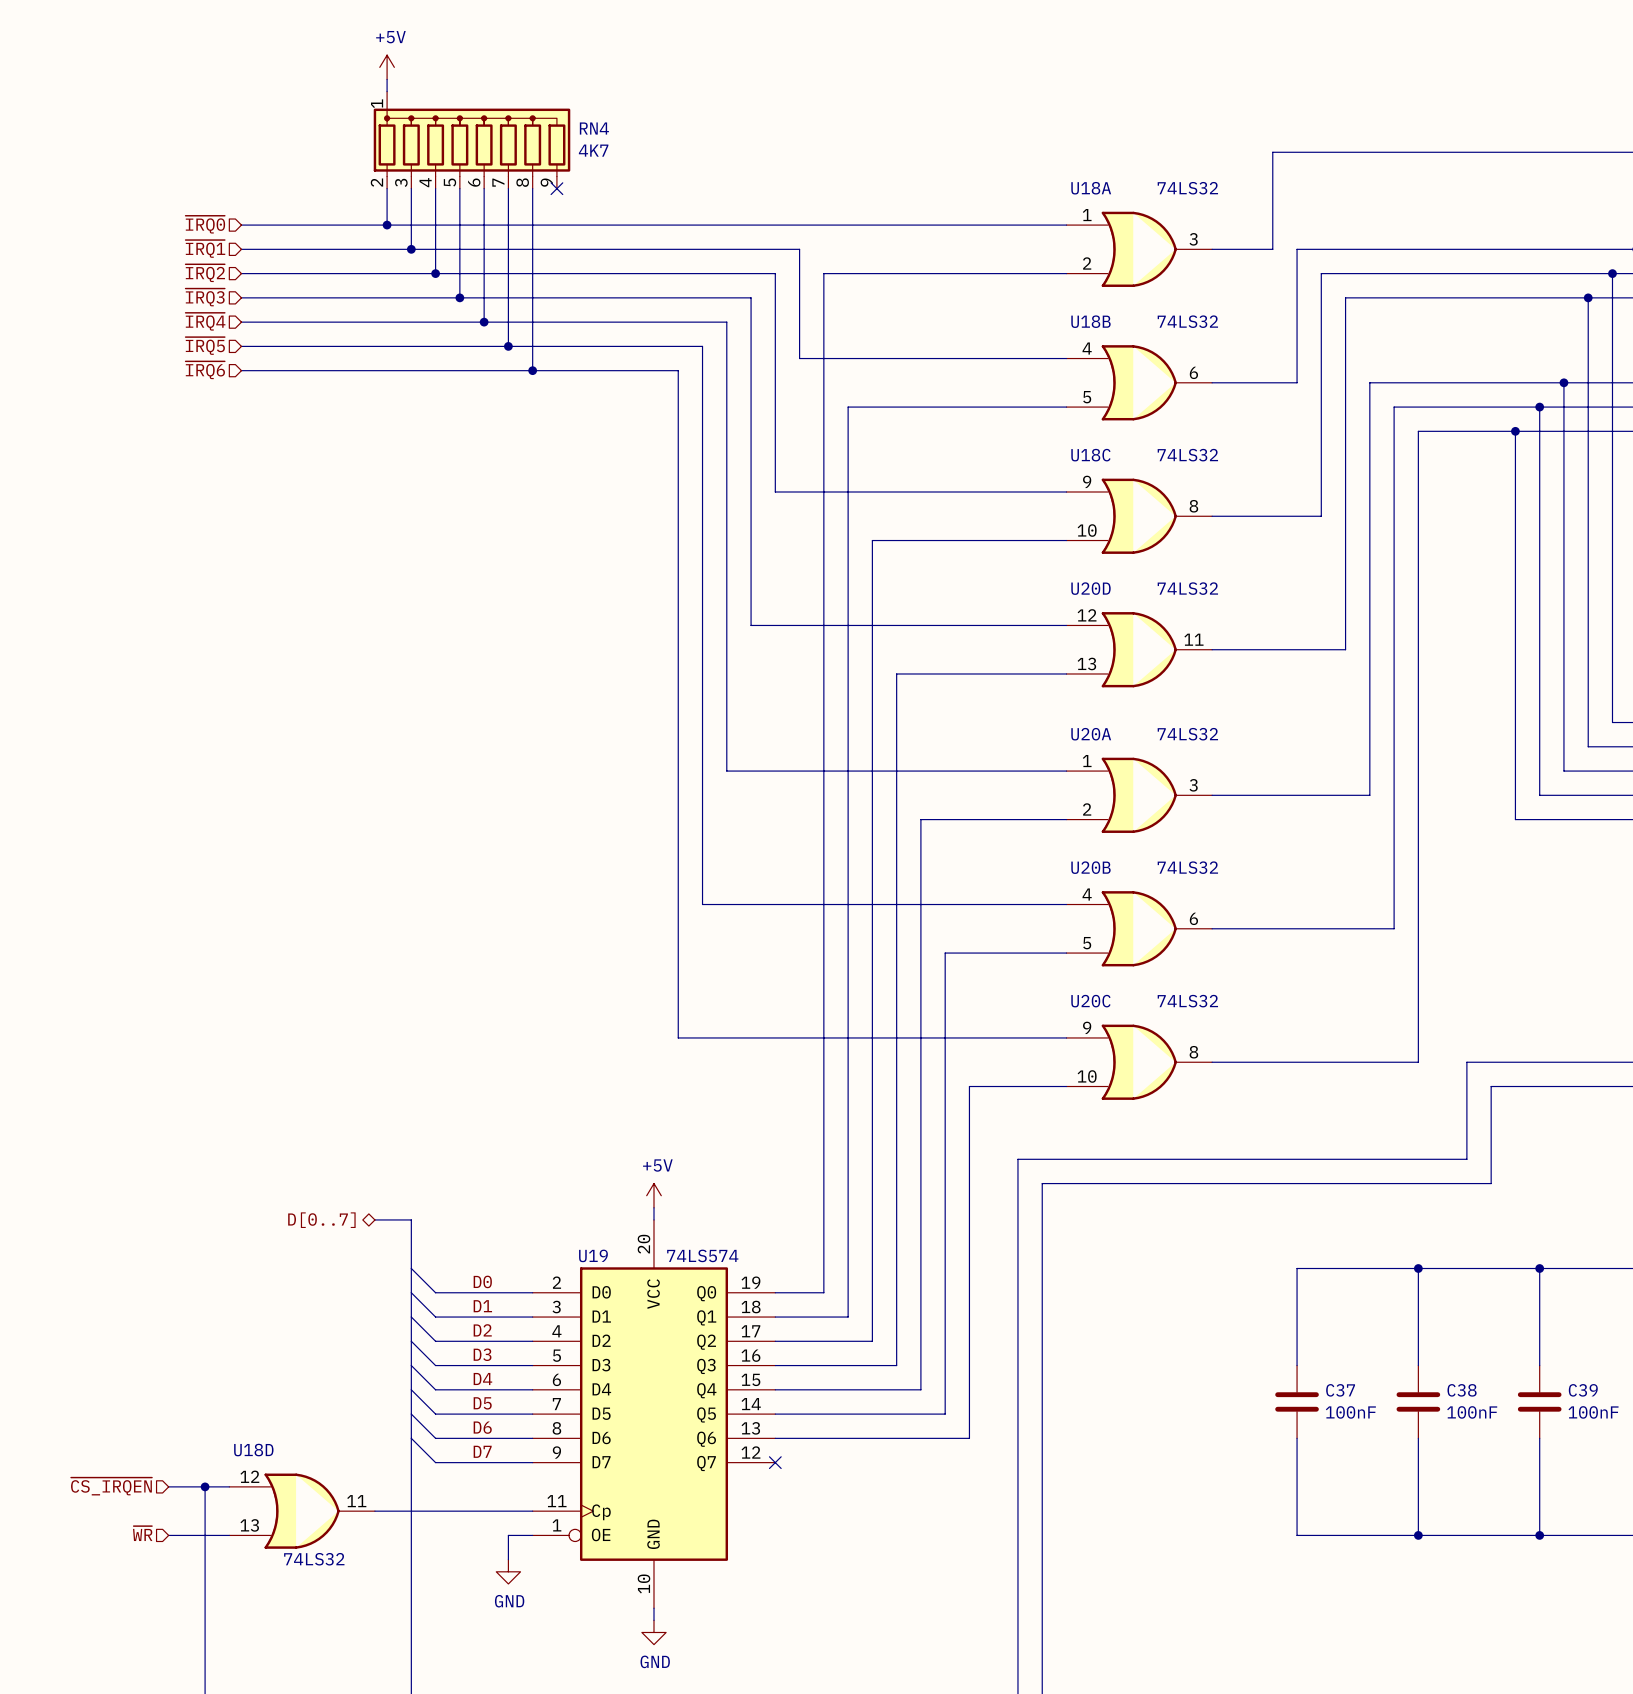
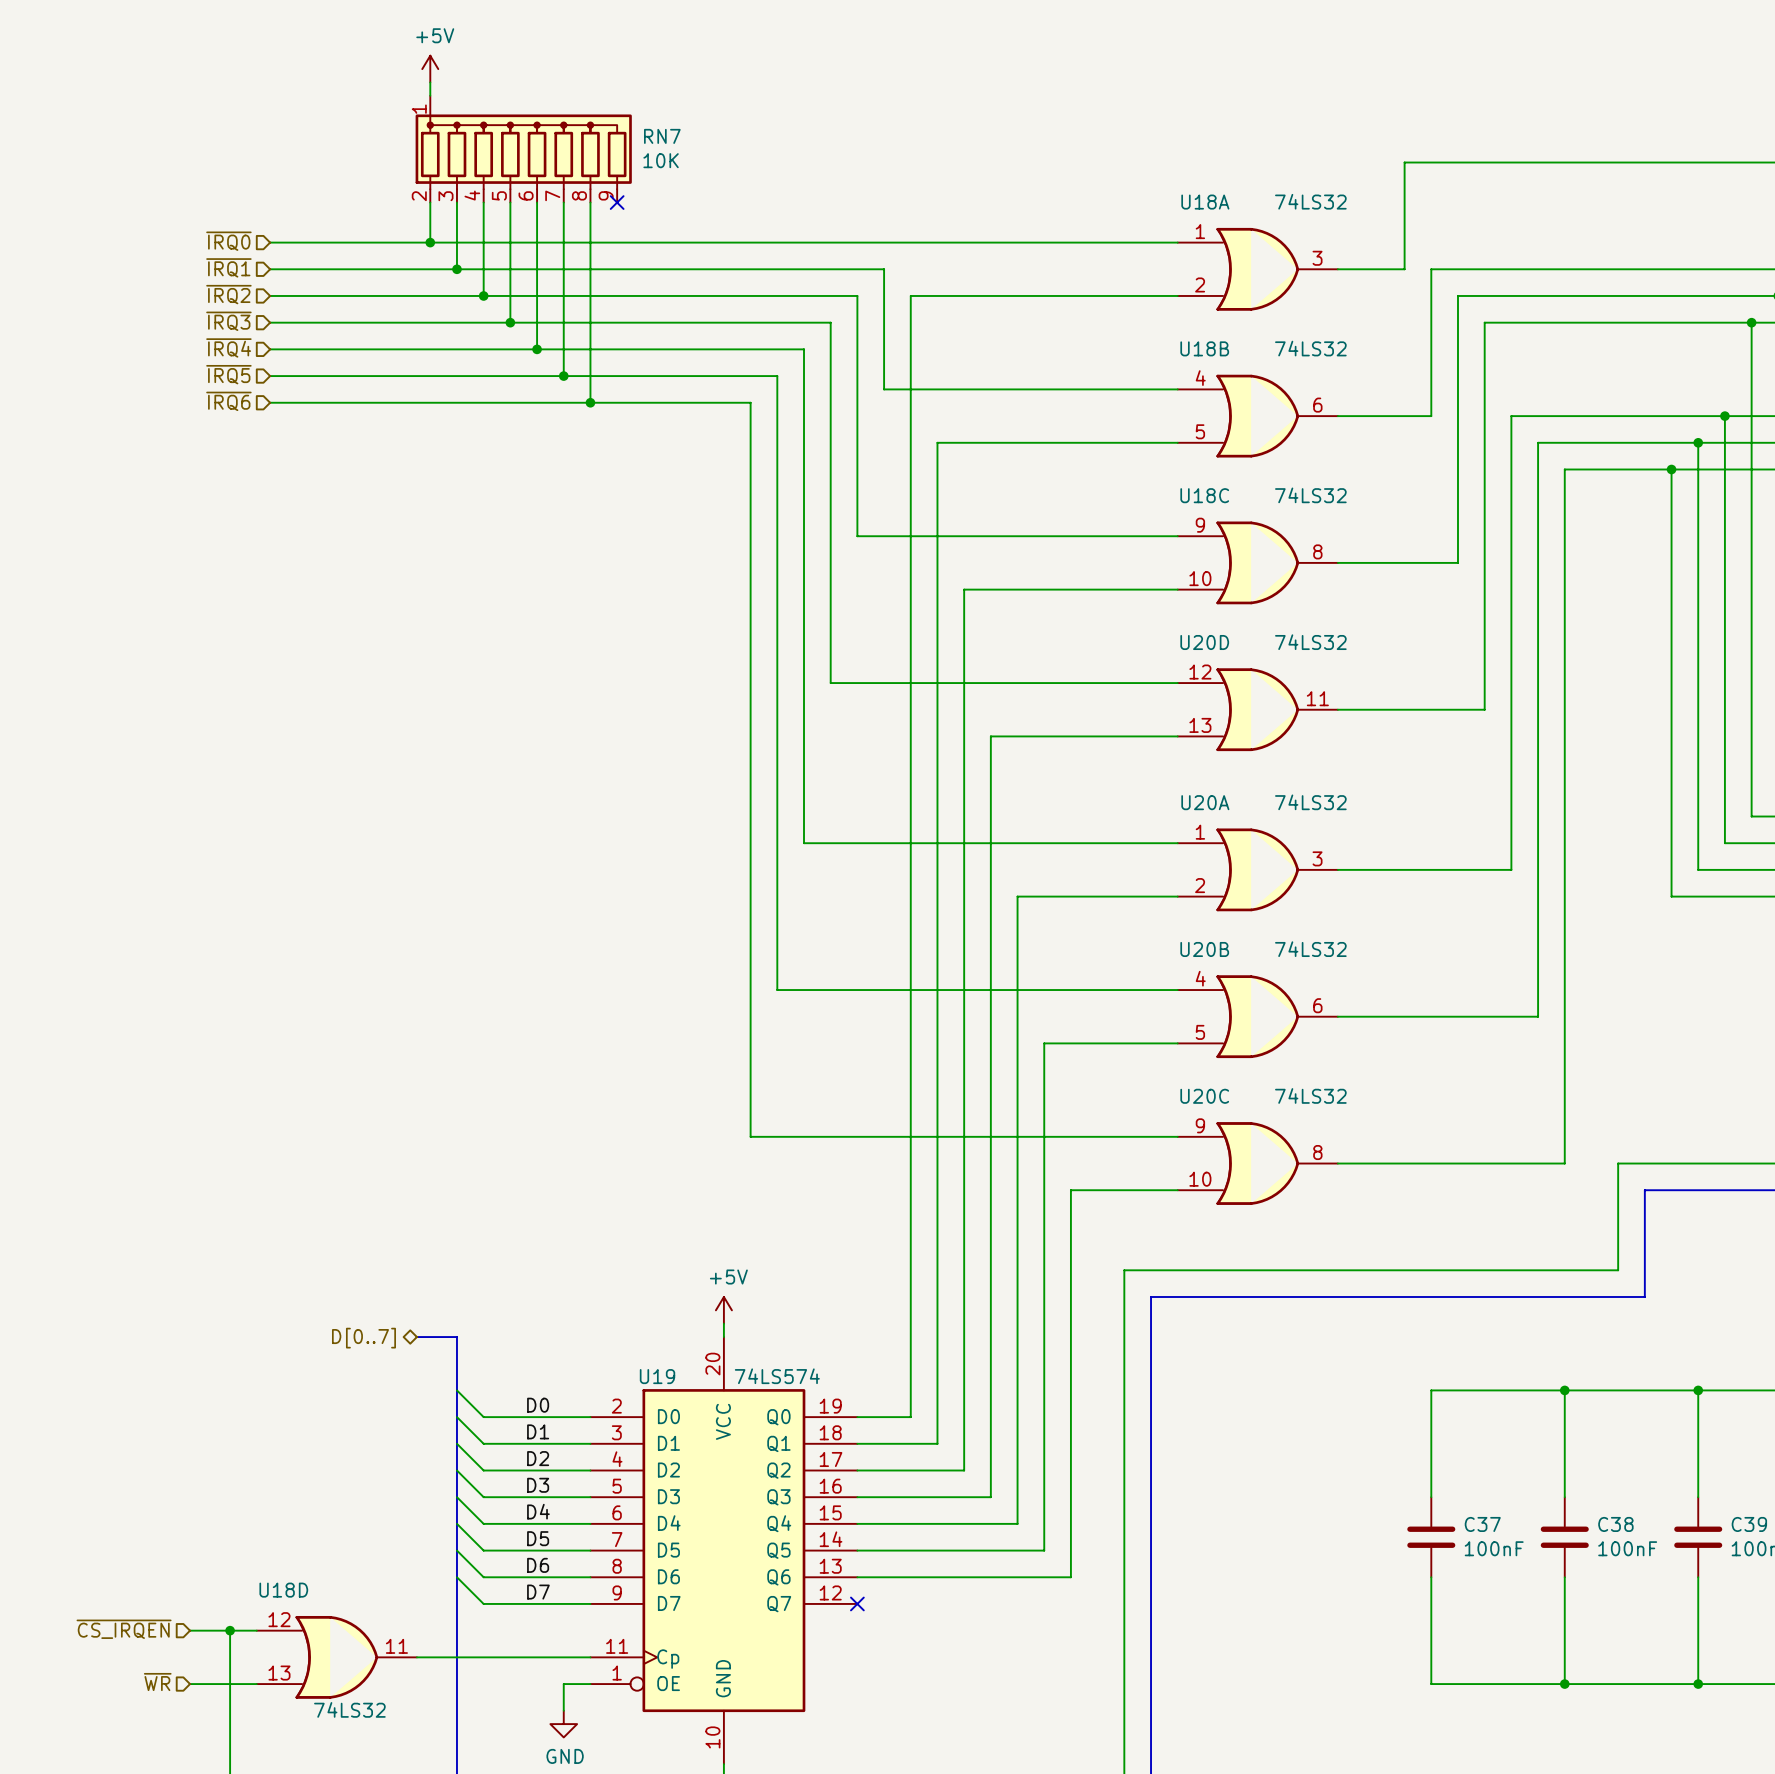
RN4 name: RN4 (594, 128) -> RN7 (662, 136)
RN4 value: 4K7 (593, 150) -> 10K (661, 160)

